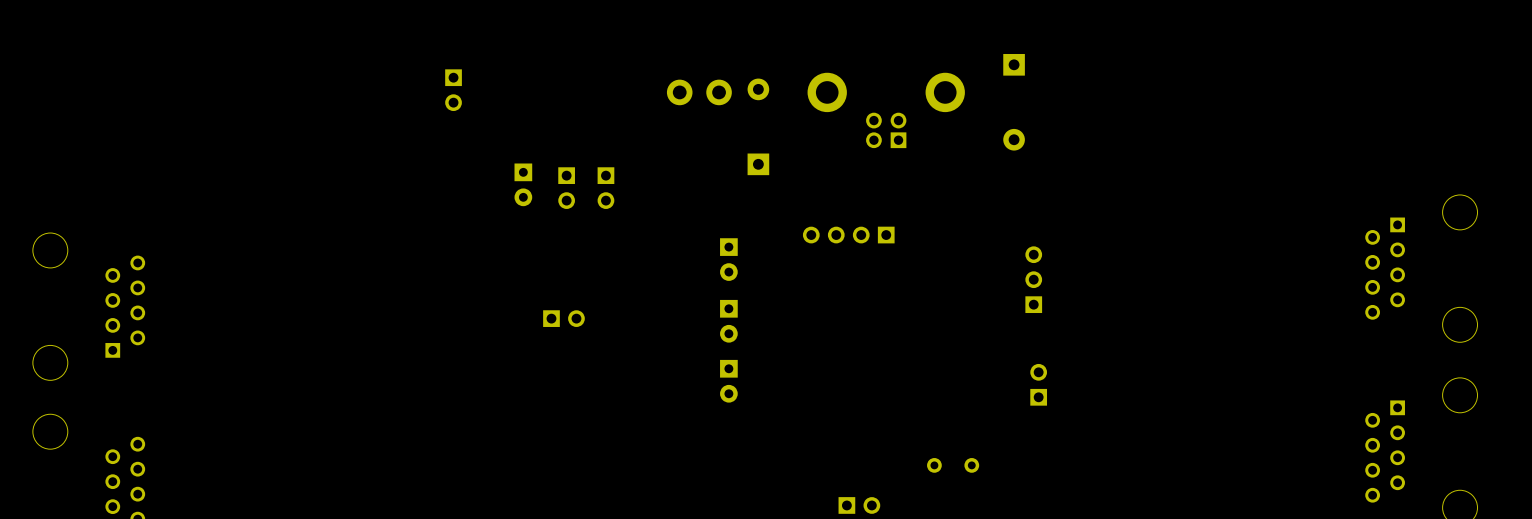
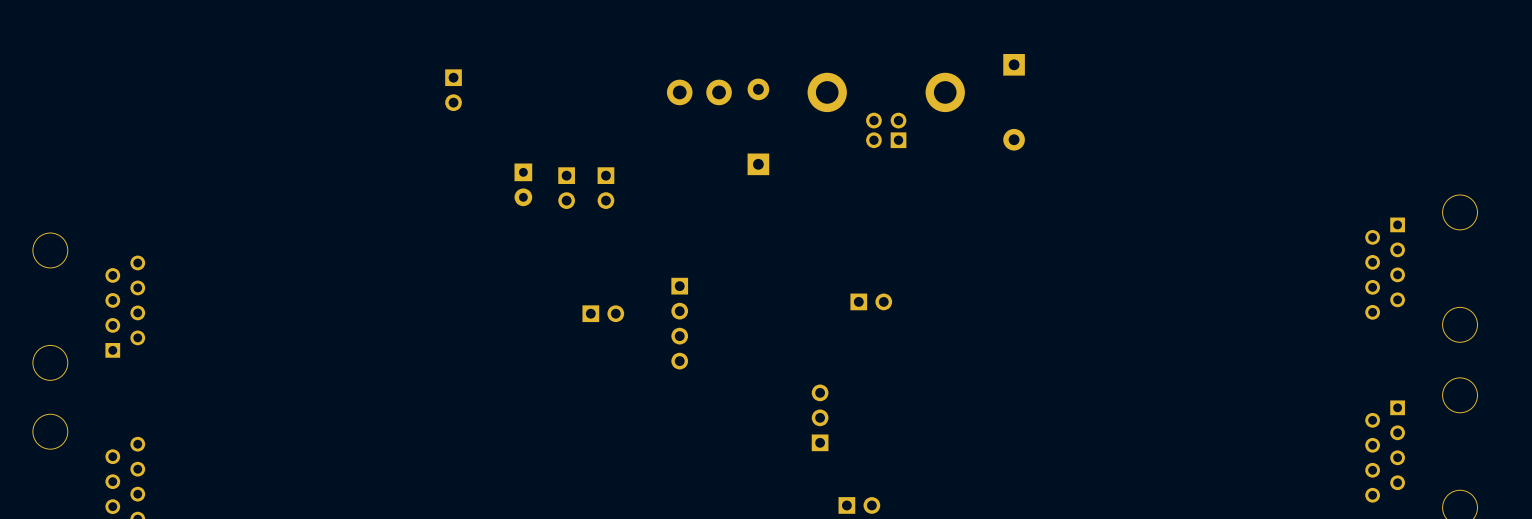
part rotation: 0° (848, 235) -> 90° counterclockwise (679, 323)
part position: (848, 235) -> (679, 323)
part: (728, 259) -> none
part: (1033, 279) -> none
part: none -> (871, 301)
part position: (563, 318) -> (603, 313)
part: (728, 321) -> none
part: (728, 381) -> none
part: (1038, 384) -> none
part: none -> (820, 417)
part: (953, 465) -> none

